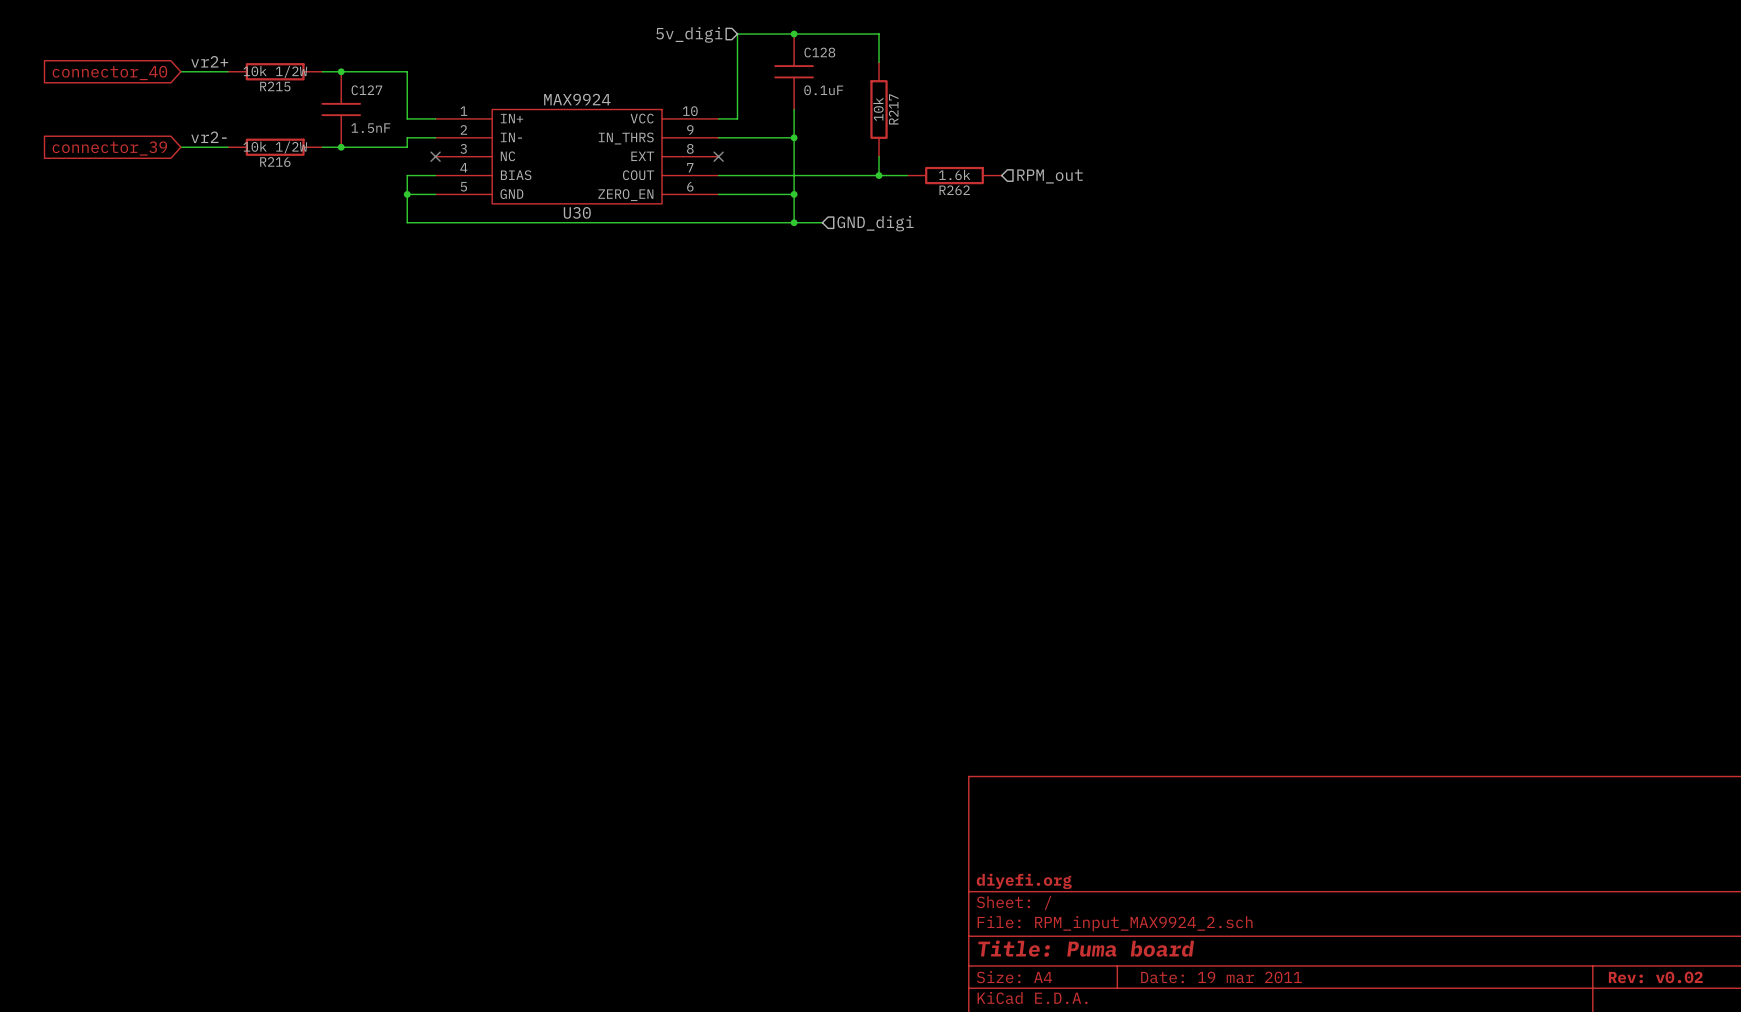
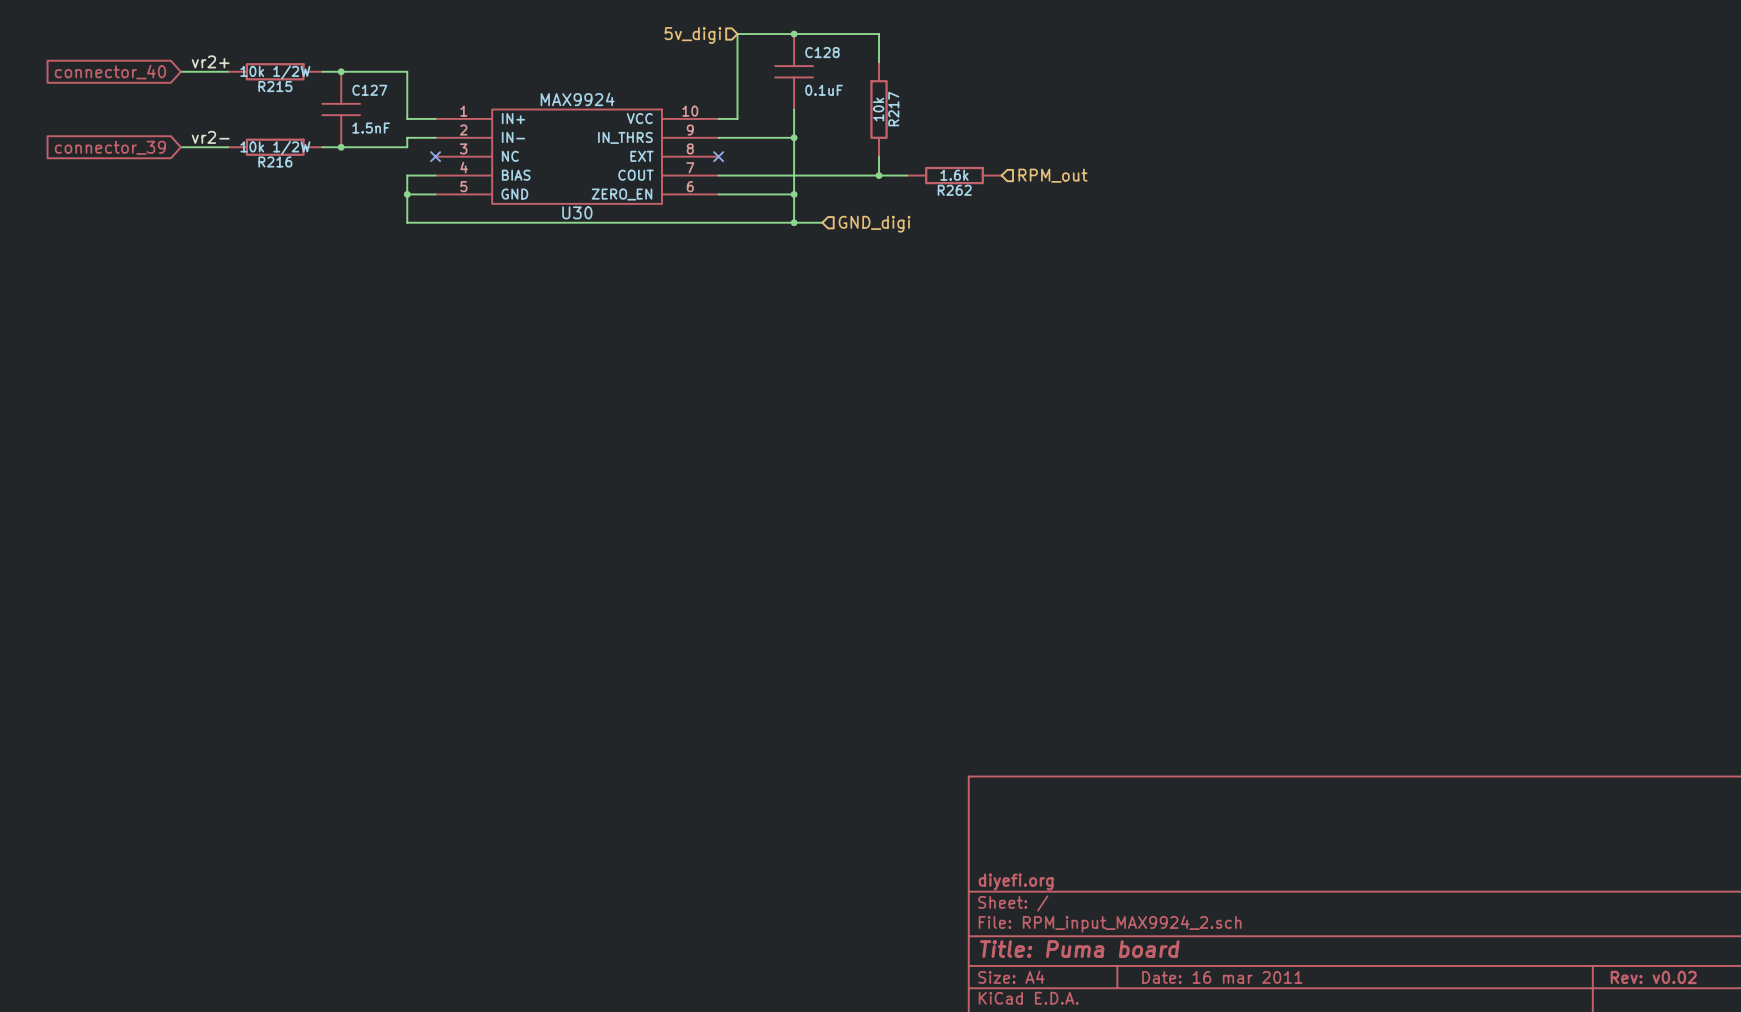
title block: Date: 19 mar 2011 (1221, 977) -> Date: 16 mar 2011 (1222, 977)

